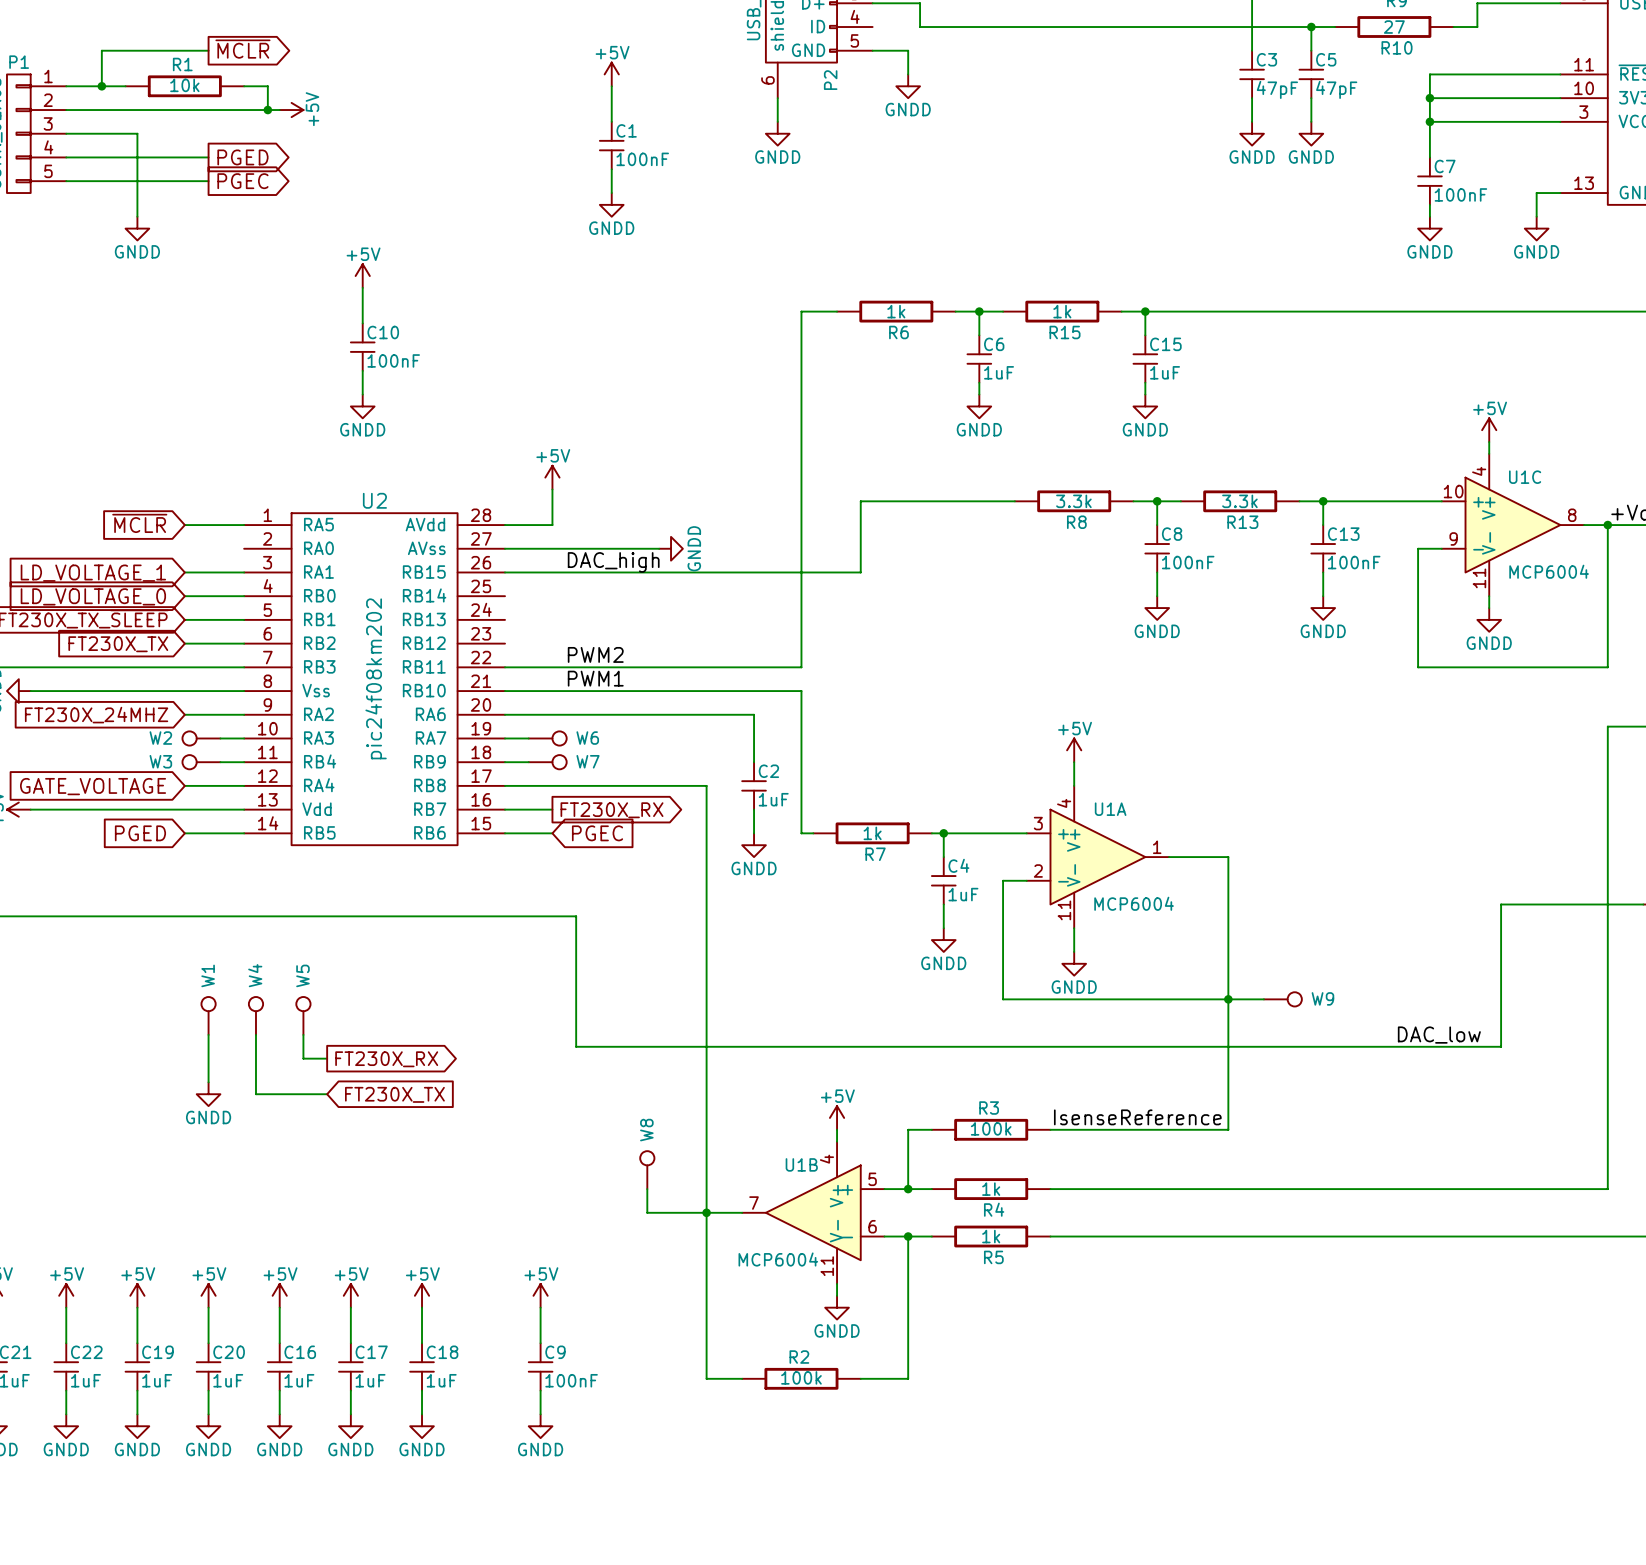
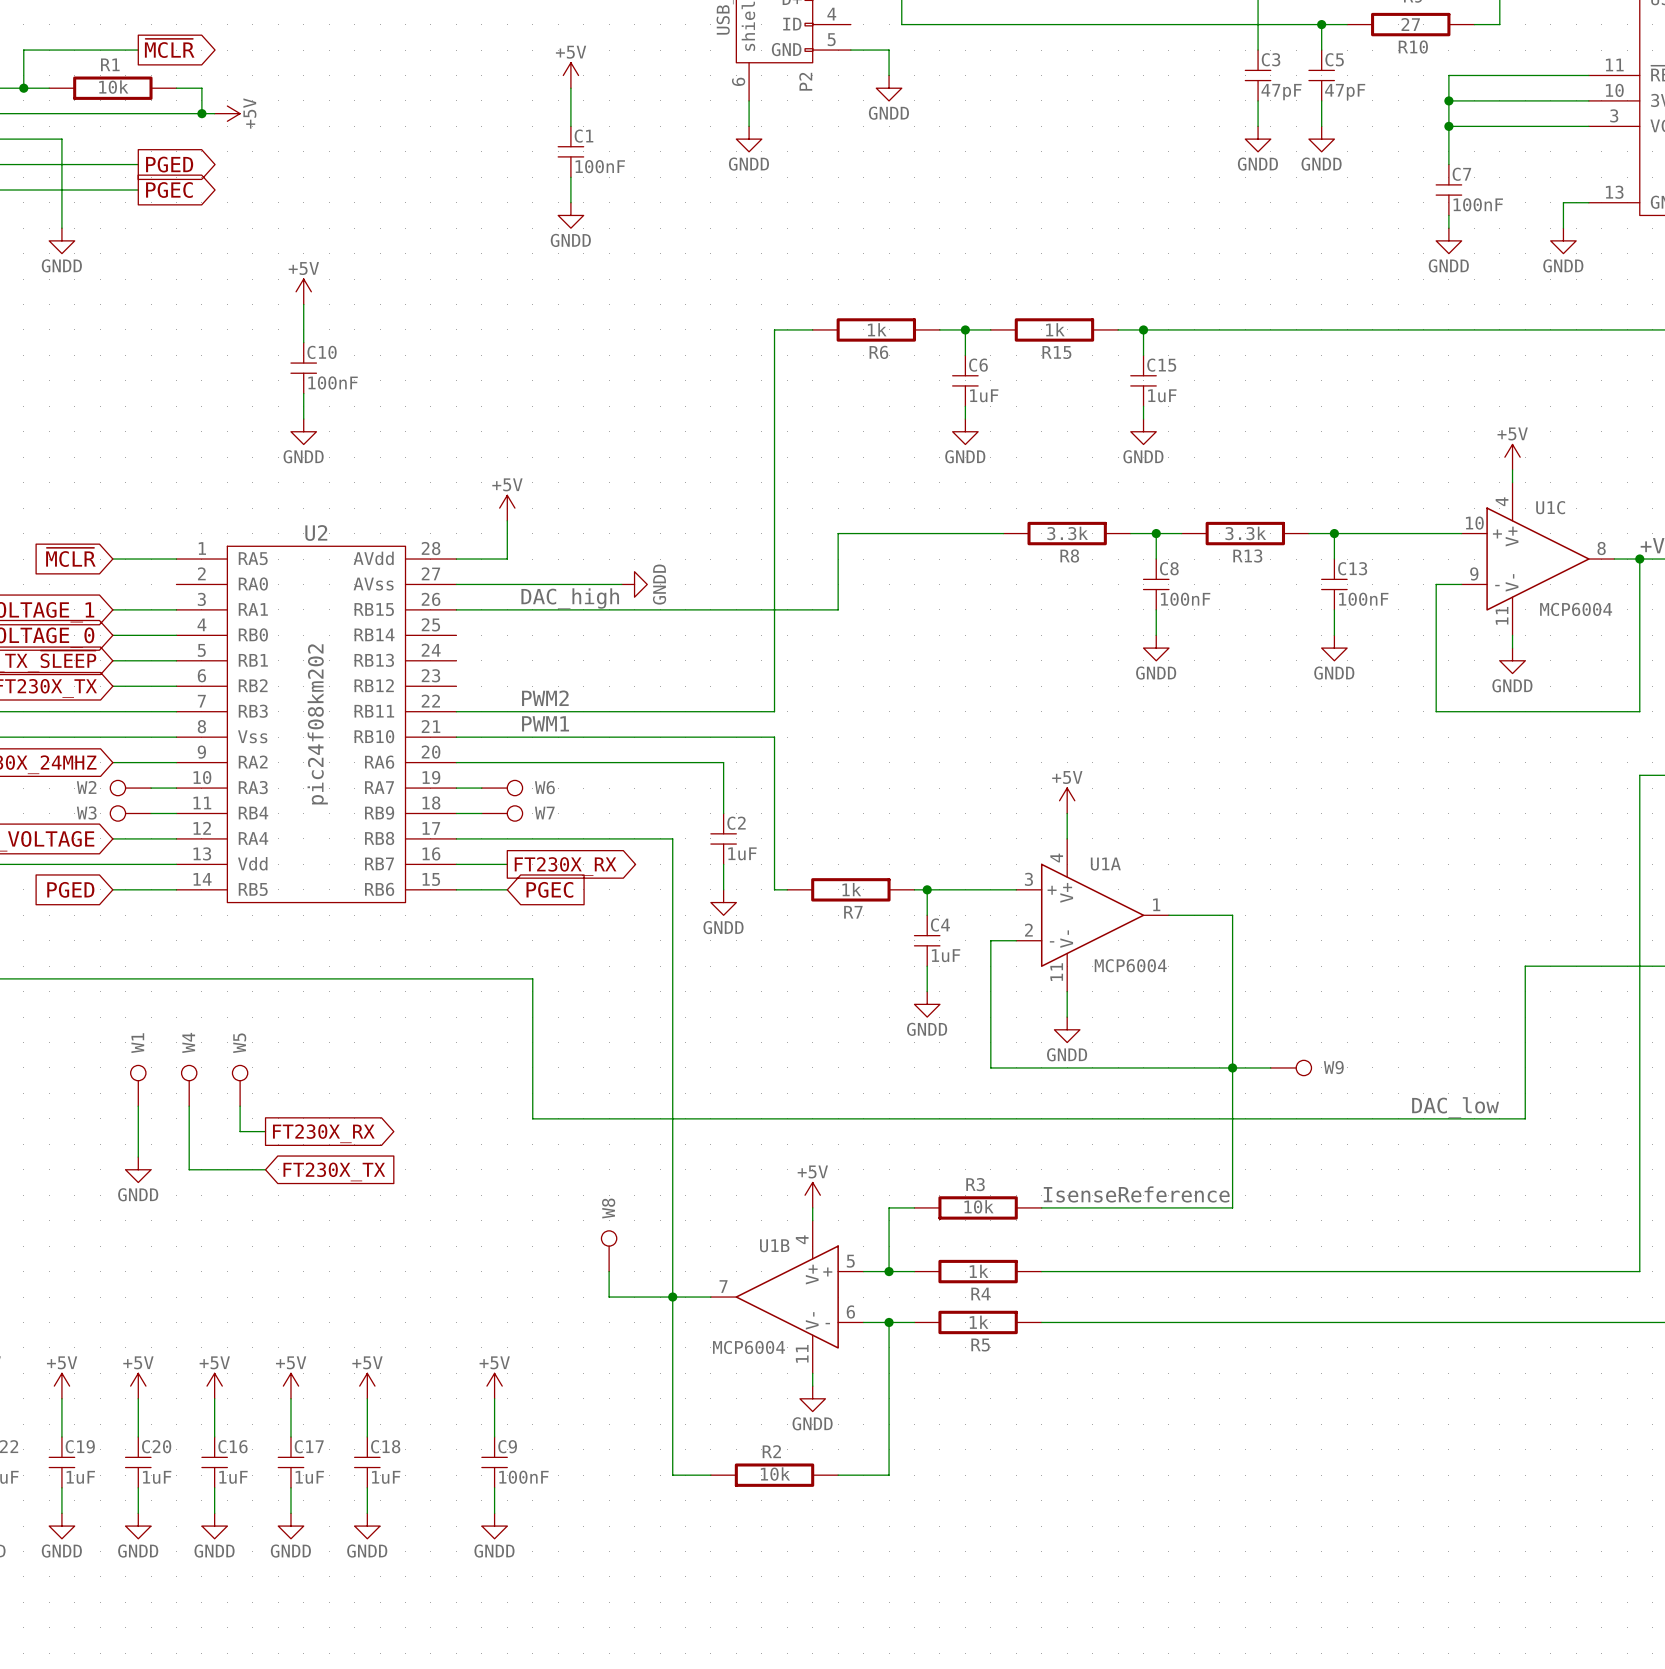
R3 value: 100k (991, 1128) -> 10k (979, 1206)
R2 value: 100k (801, 1377) -> 10k (775, 1474)

